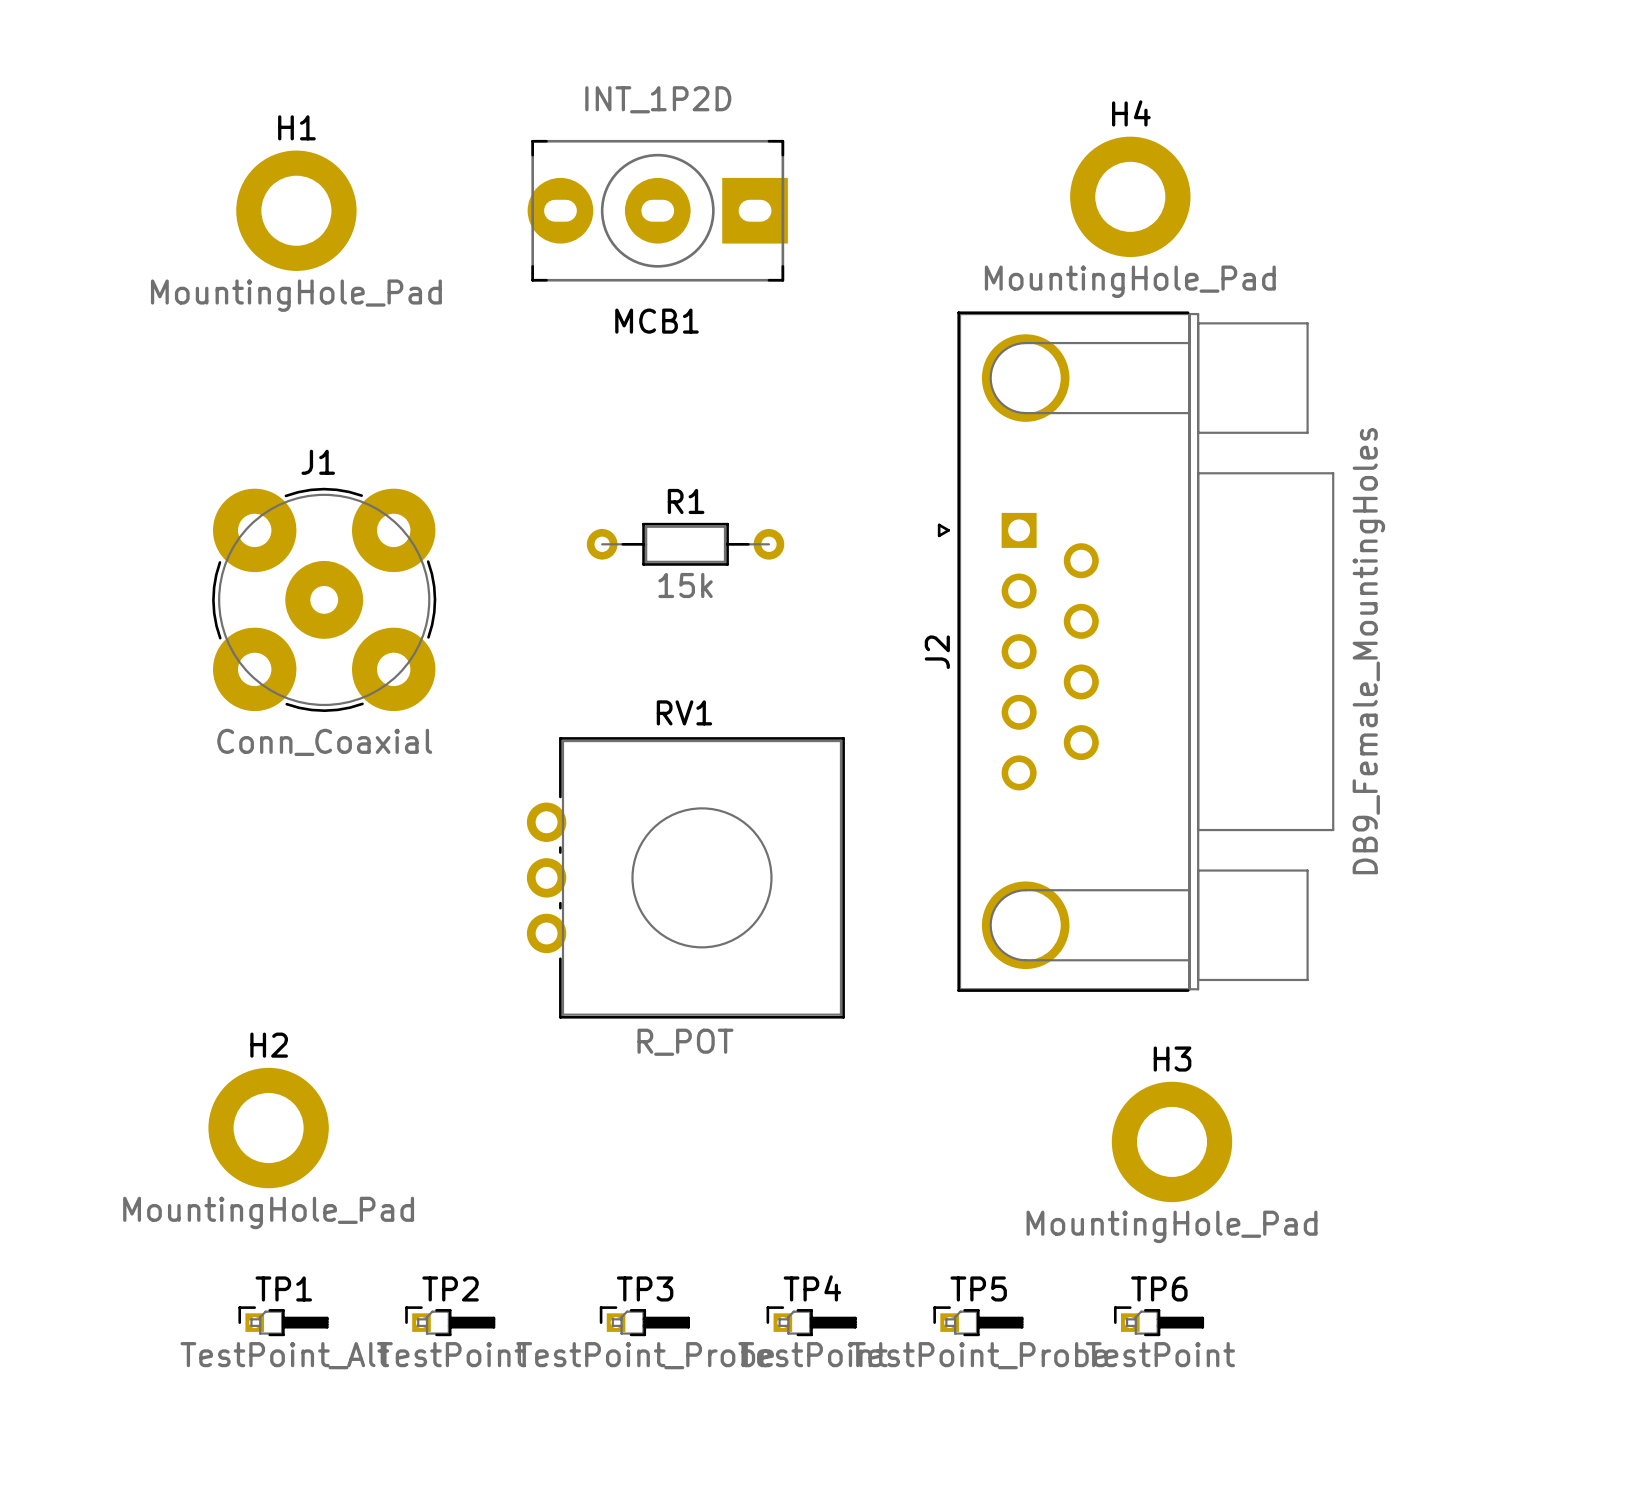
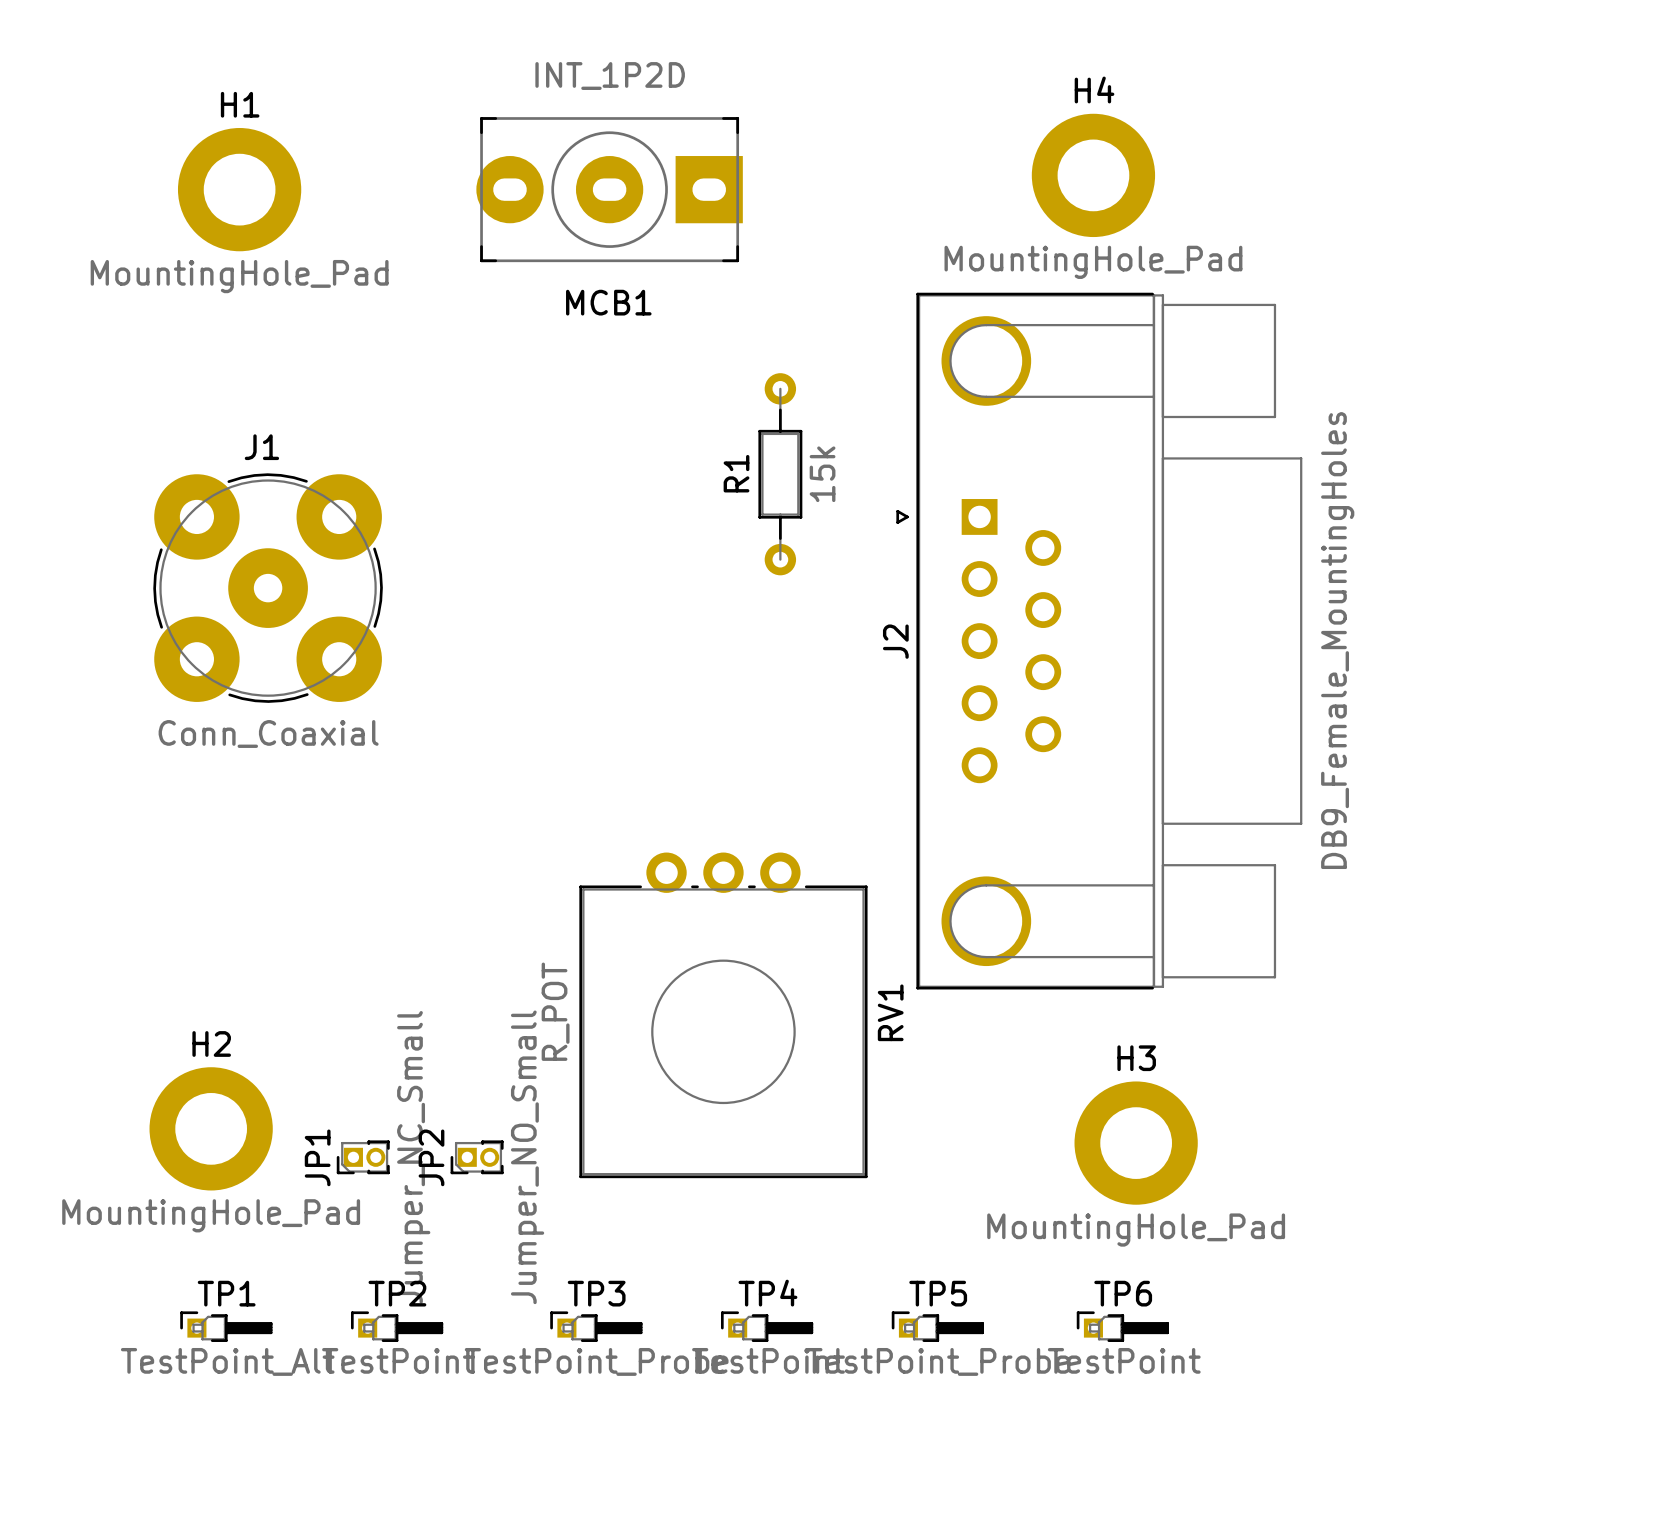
R1 name position: R1 (686, 501) -> R1 (736, 473)
R1 rotation: 0° (685, 544) -> 90° clockwise (780, 474)
R1 position: (685, 544) -> (780, 474)
R1 value position: 15k (685, 585) -> 15k (822, 474)
RV1 rotation: 0° (685, 877) -> 90° clockwise (723, 1015)
JP1: none -> Jumper_NC_Small (363, 1157)
JP2: none -> Jumper_NO_Small (477, 1157)

